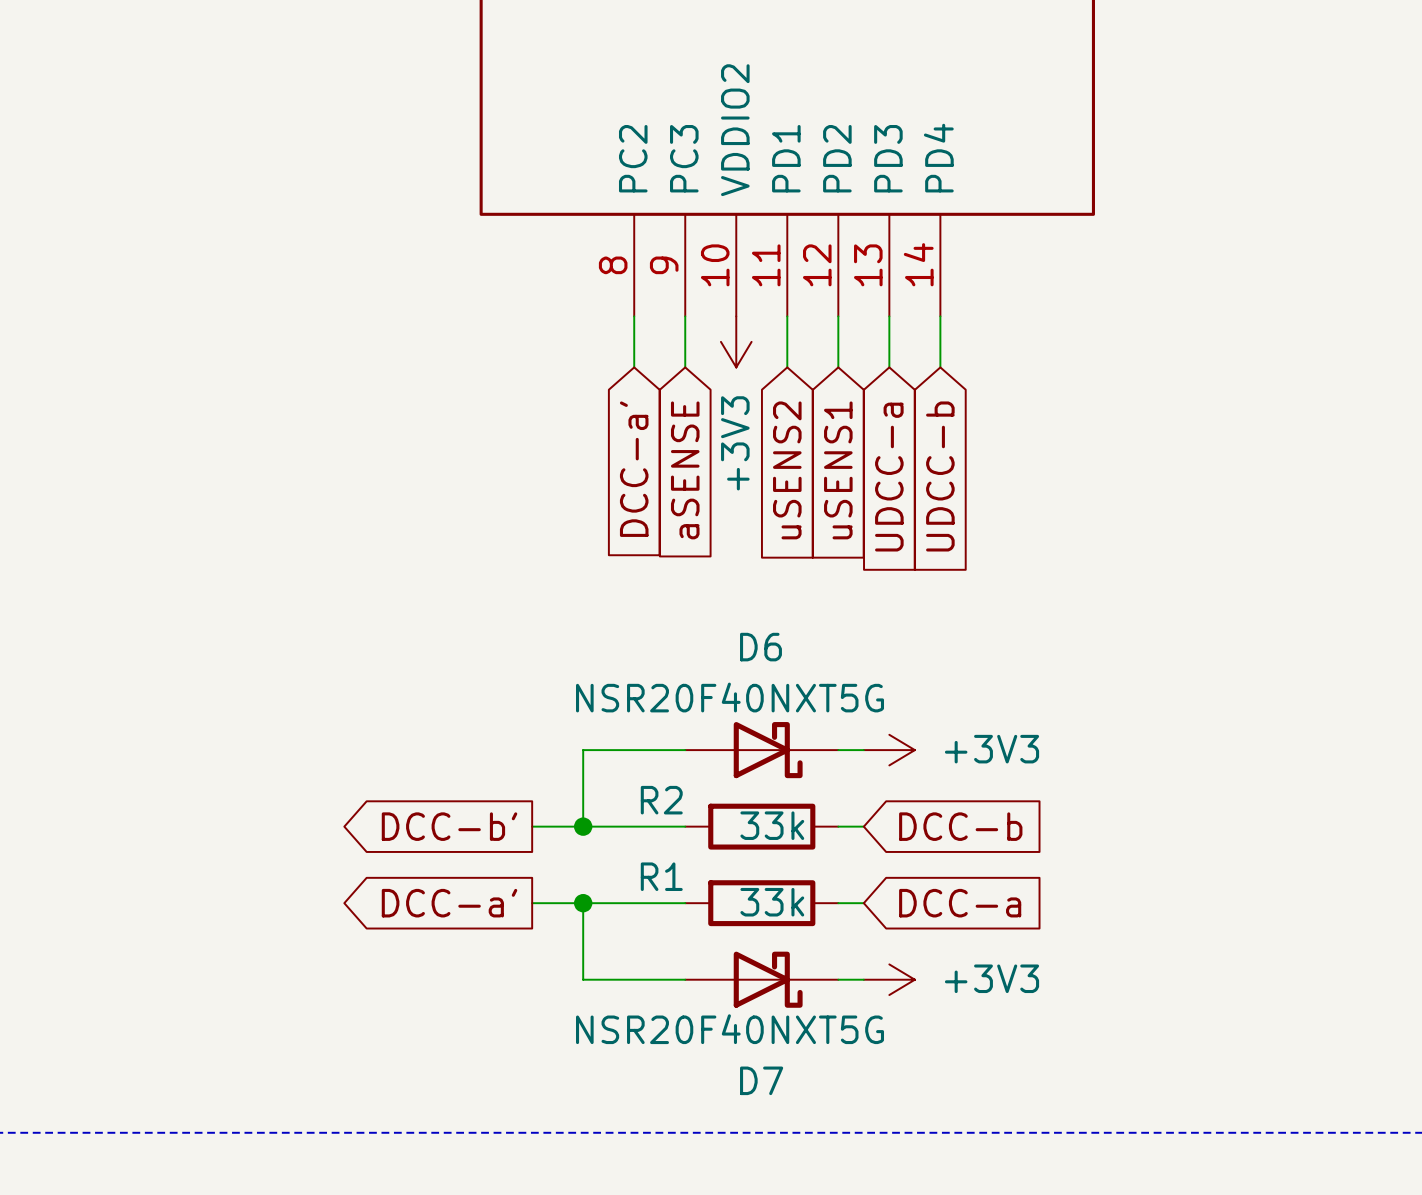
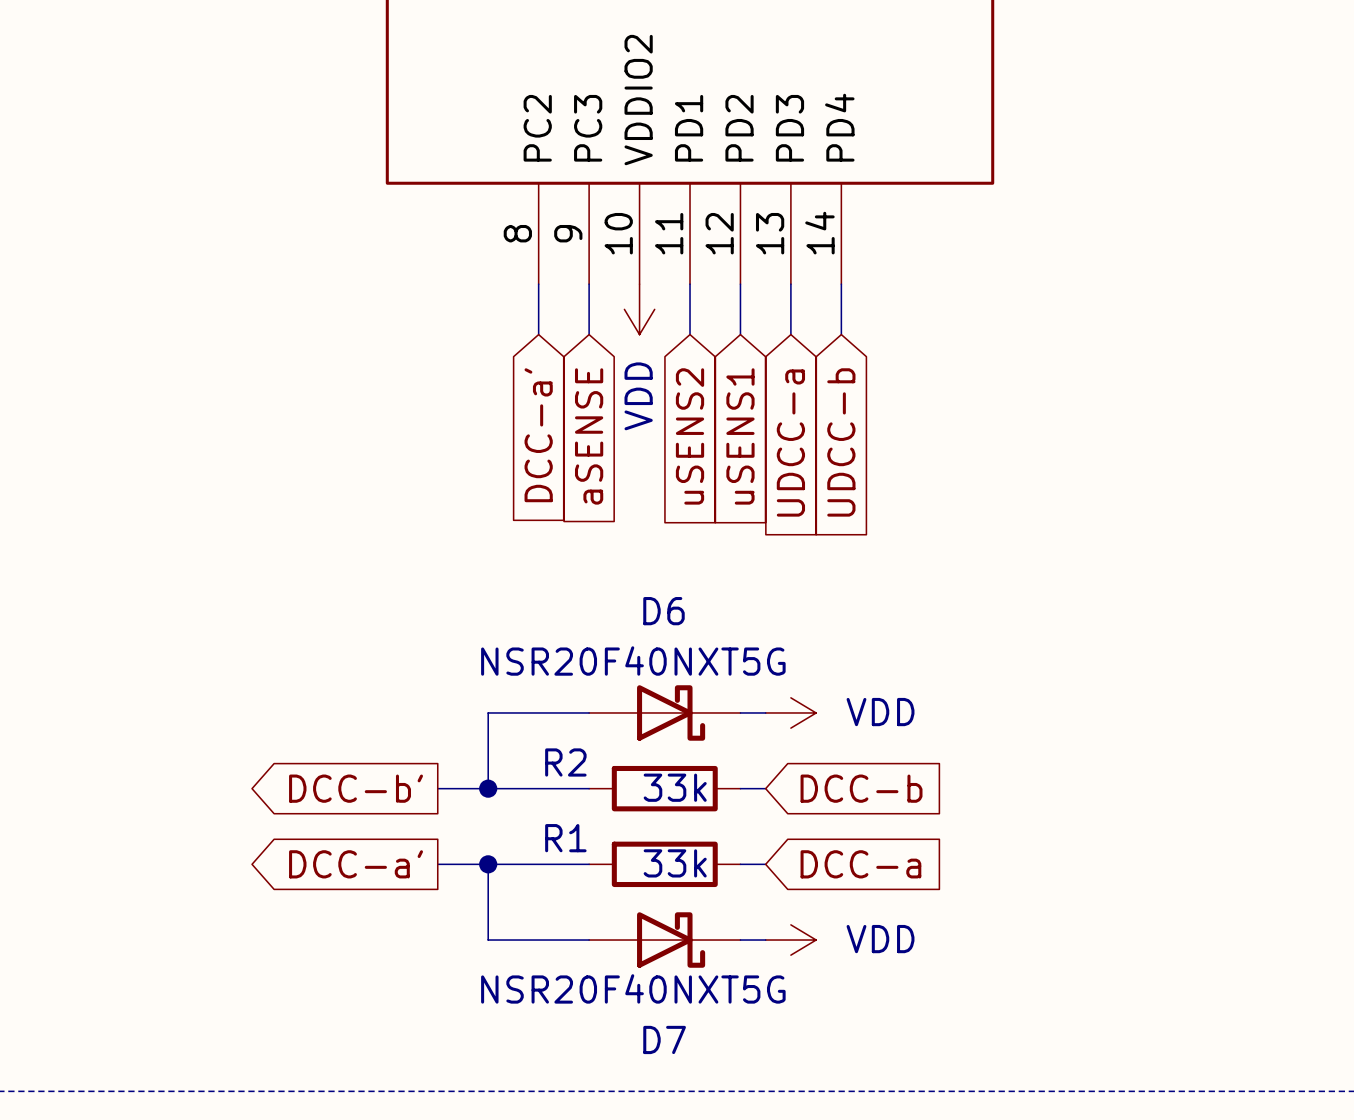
power symbol: +3V3 (736, 341) -> VDD (639, 309)
power symbol: +3V3 (889, 750) -> VDD (790, 712)
power symbol: +3V3 (889, 979) -> VDD (790, 940)

